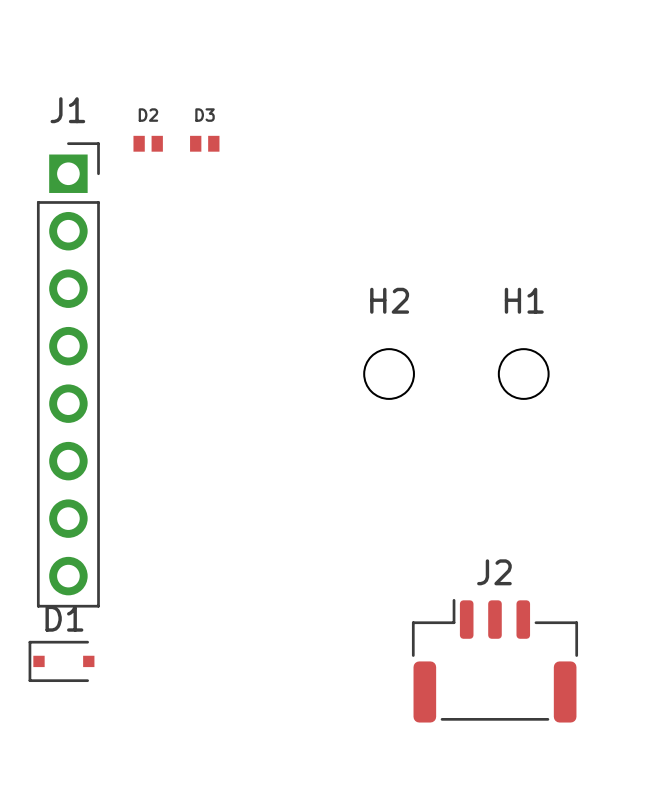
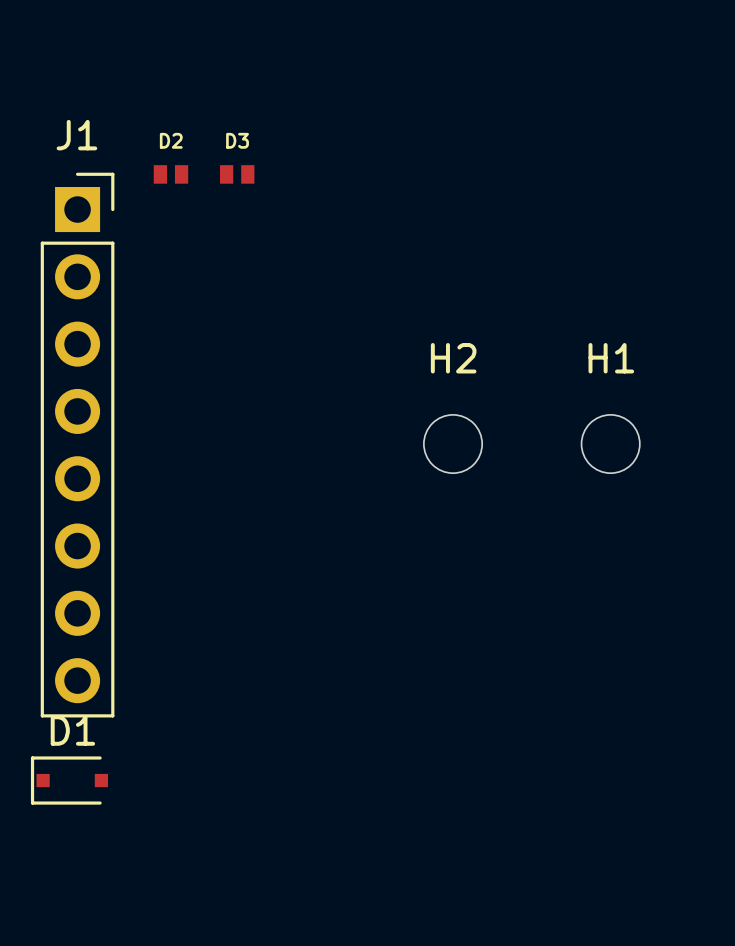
J2: (494, 660) -> none

